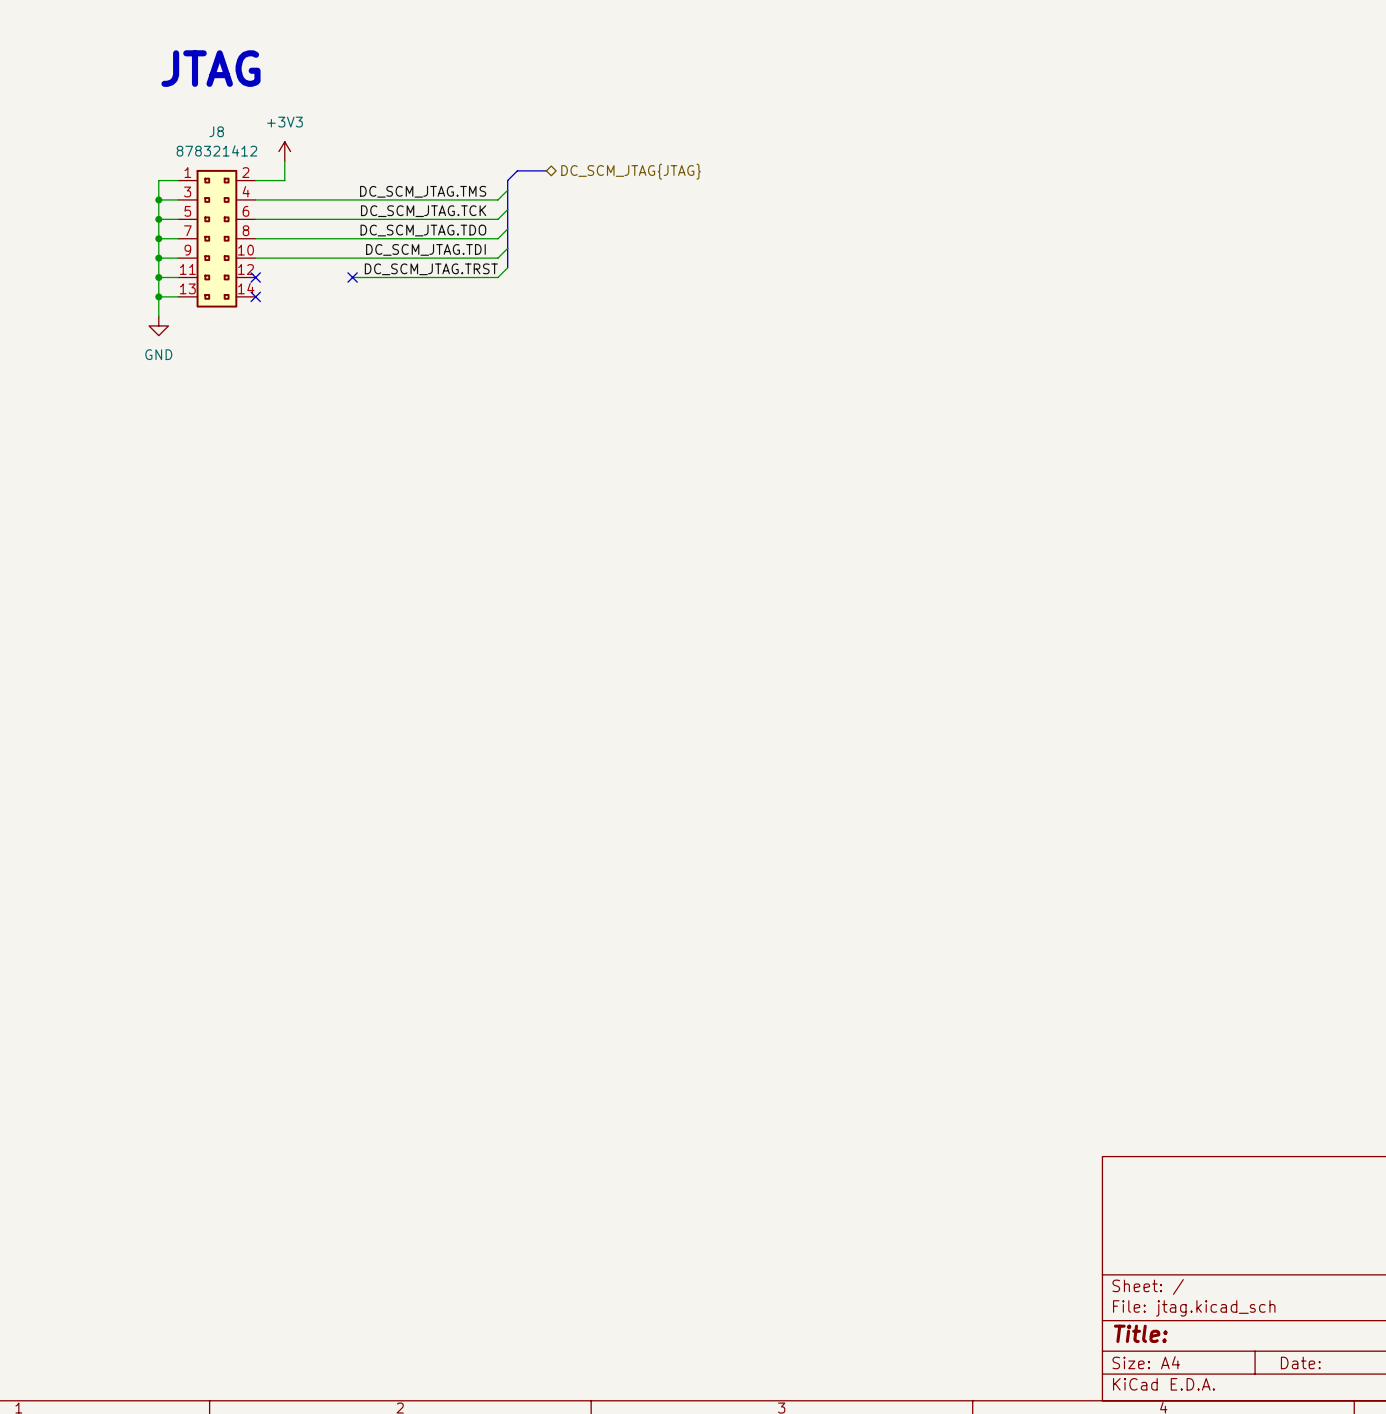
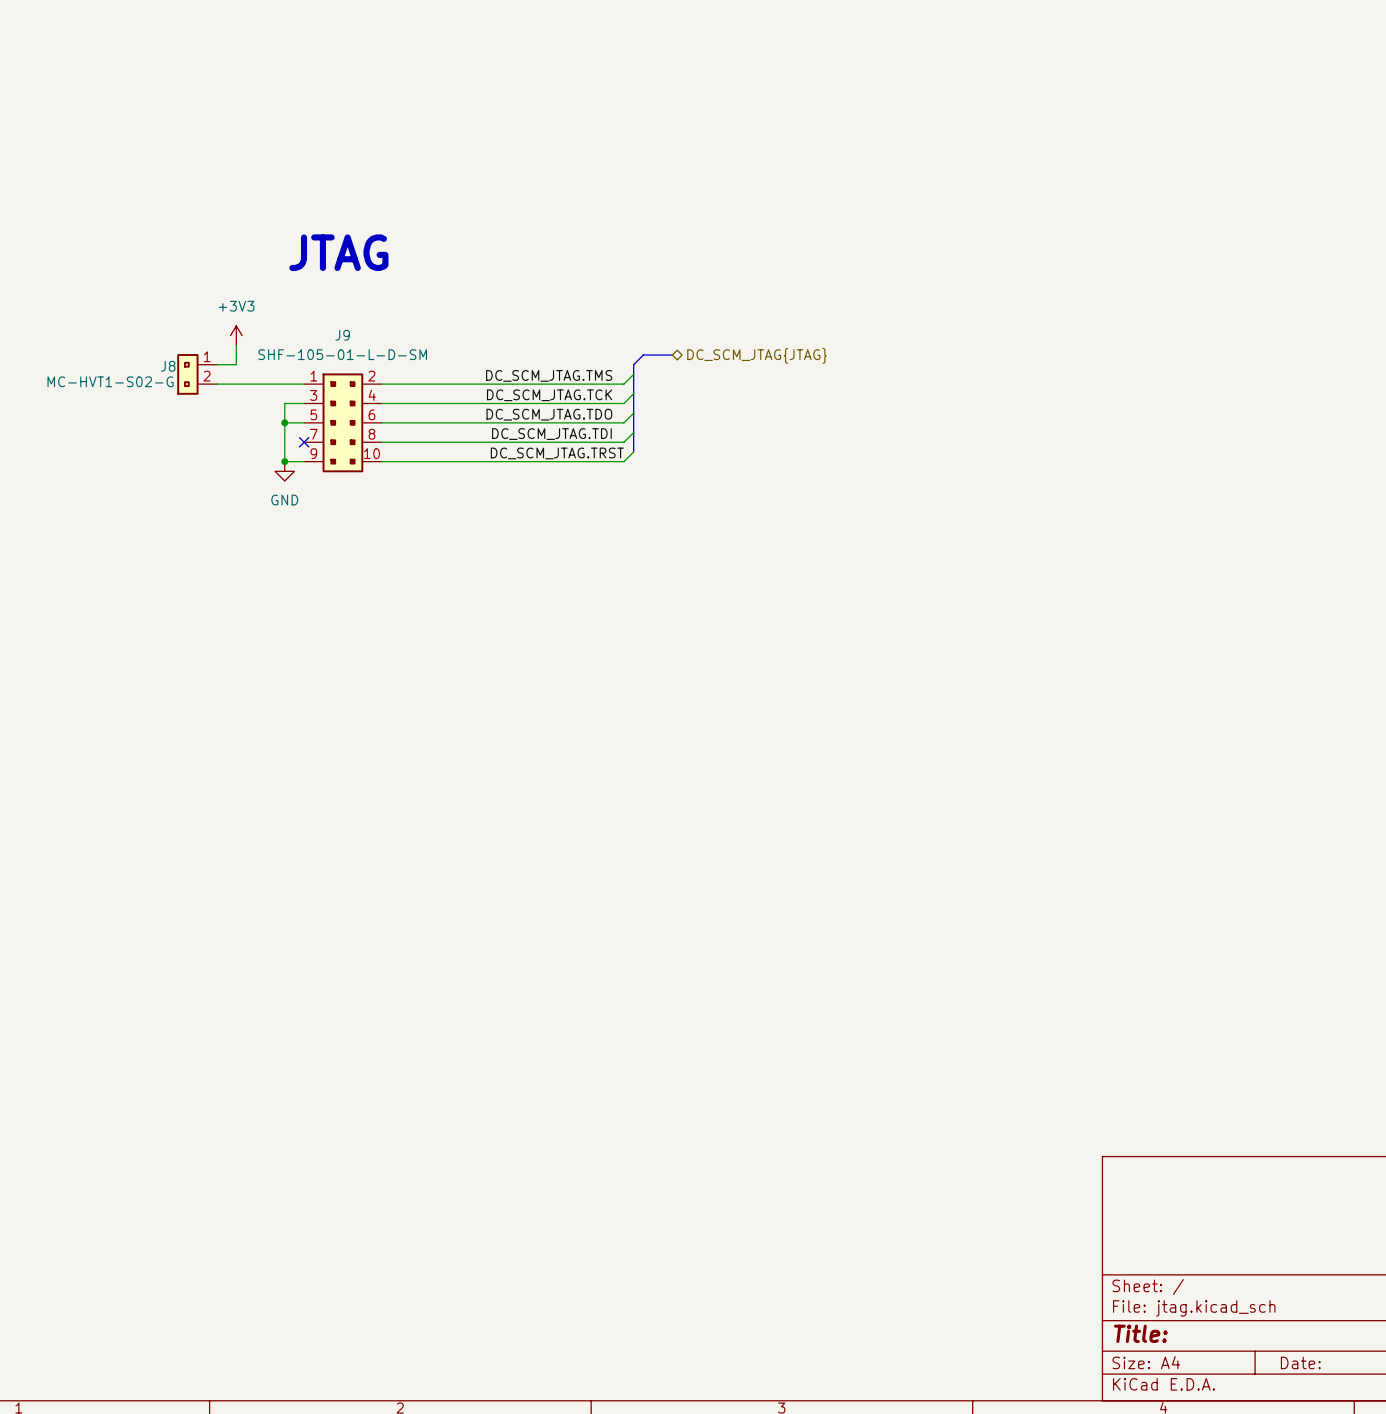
text: JTAG (210, 68) -> none
J8 name position: J8 (216, 131) -> J8 (168, 366)
J8 text: 878321412 (216, 150) -> MC-HVT1-S02-G (110, 381)
power symbol position: +3V3 (284, 151) -> +3V3 (236, 335)
wire: (284, 161) (284, 180) (255, 180) -> none
J8 symbol: [178, 169, 256, 308] -> [177, 354, 217, 395]
bus: (546, 170) (517, 170) (507, 180) (507, 267) -> none
hierarchical label: DC_SCM_JTAG{JTAG} (631, 171) -> none
wire: (178, 180) (158, 180) (158, 316) -> none
wire: (507, 190) (497, 199) (255, 199) -> none
label: DC_SCM_JTAG.TMS (423, 191) -> none
wire: (158, 199) (178, 199) -> none
junction: (158, 199) -> none
wire: (507, 209) (497, 219) (255, 219) -> none
label: DC_SCM_JTAG.TCK (423, 211) -> none
wire: (158, 219) (178, 219) -> none
junction: (158, 219) -> none
wire: (507, 229) (497, 238) (255, 238) -> none
label: DC_SCM_JTAG.TDO (423, 230) -> none
wire: (158, 238) (178, 238) -> none
junction: (158, 238) -> none
wire: (507, 248) (497, 258) (255, 258) -> (633, 374) (623, 384) (381, 384)
label: DC_SCM_JTAG.TDI (425, 249) -> none
text: none -> JTAG (338, 252)
wire: (158, 258) (178, 258) -> none
junction: (158, 258) -> none
wire: (507, 267) (497, 277) (352, 277) -> none
label: DC_SCM_JTAG.TRST (431, 269) -> none
wire: (158, 277) (178, 277) -> none
junction: (158, 277) -> none
no-connect mark: (255, 277) -> none
no-connect mark: (352, 277) -> none
wire: (158, 296) (178, 296) -> (284, 422) (304, 422)
junction: (158, 296) -> none
no-connect mark: (255, 296) -> none
power symbol: GND (158, 325) -> none
wire: none -> (236, 345) (236, 364) (216, 364)
bus: none -> (672, 355) (643, 355) (633, 364) (633, 451)
hierarchical label: none -> DC_SCM_JTAG{JTAG} (757, 355)
label: none -> DC_SCM_JTAG.TMS (549, 375)
wire: none -> (216, 384) (304, 384)
wire: none -> (633, 393) (623, 403) (381, 403)
label: none -> DC_SCM_JTAG.TCK (549, 395)
wire: none -> (304, 403) (284, 403) (284, 461) (304, 461)
wire: none -> (633, 413) (623, 422) (381, 422)
label: none -> DC_SCM_JTAG.TDO (549, 414)
junction: none -> (284, 422)
J9: none -> (342, 422)
wire: none -> (633, 432) (623, 442) (381, 442)
label: none -> DC_SCM_JTAG.TDI (551, 434)
no-connect mark: none -> (304, 442)
wire: none -> (633, 451) (623, 461) (381, 461)
label: none -> DC_SCM_JTAG.TRST (557, 453)
junction: none -> (284, 461)
power symbol: none -> GND (284, 471)

